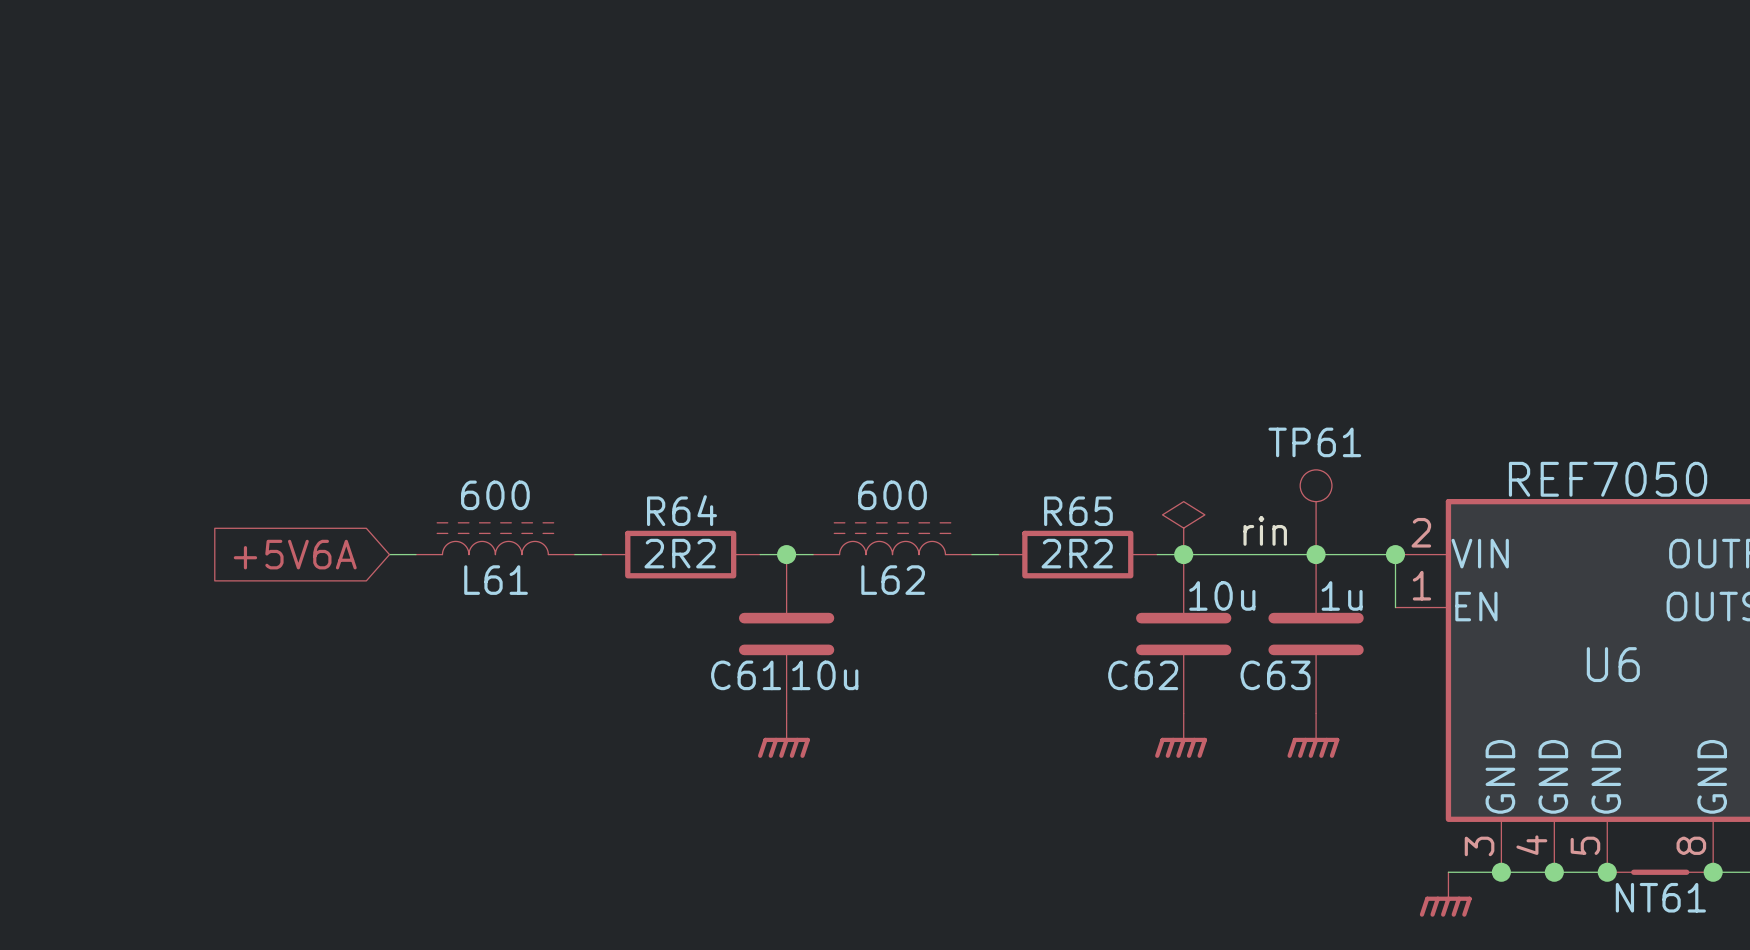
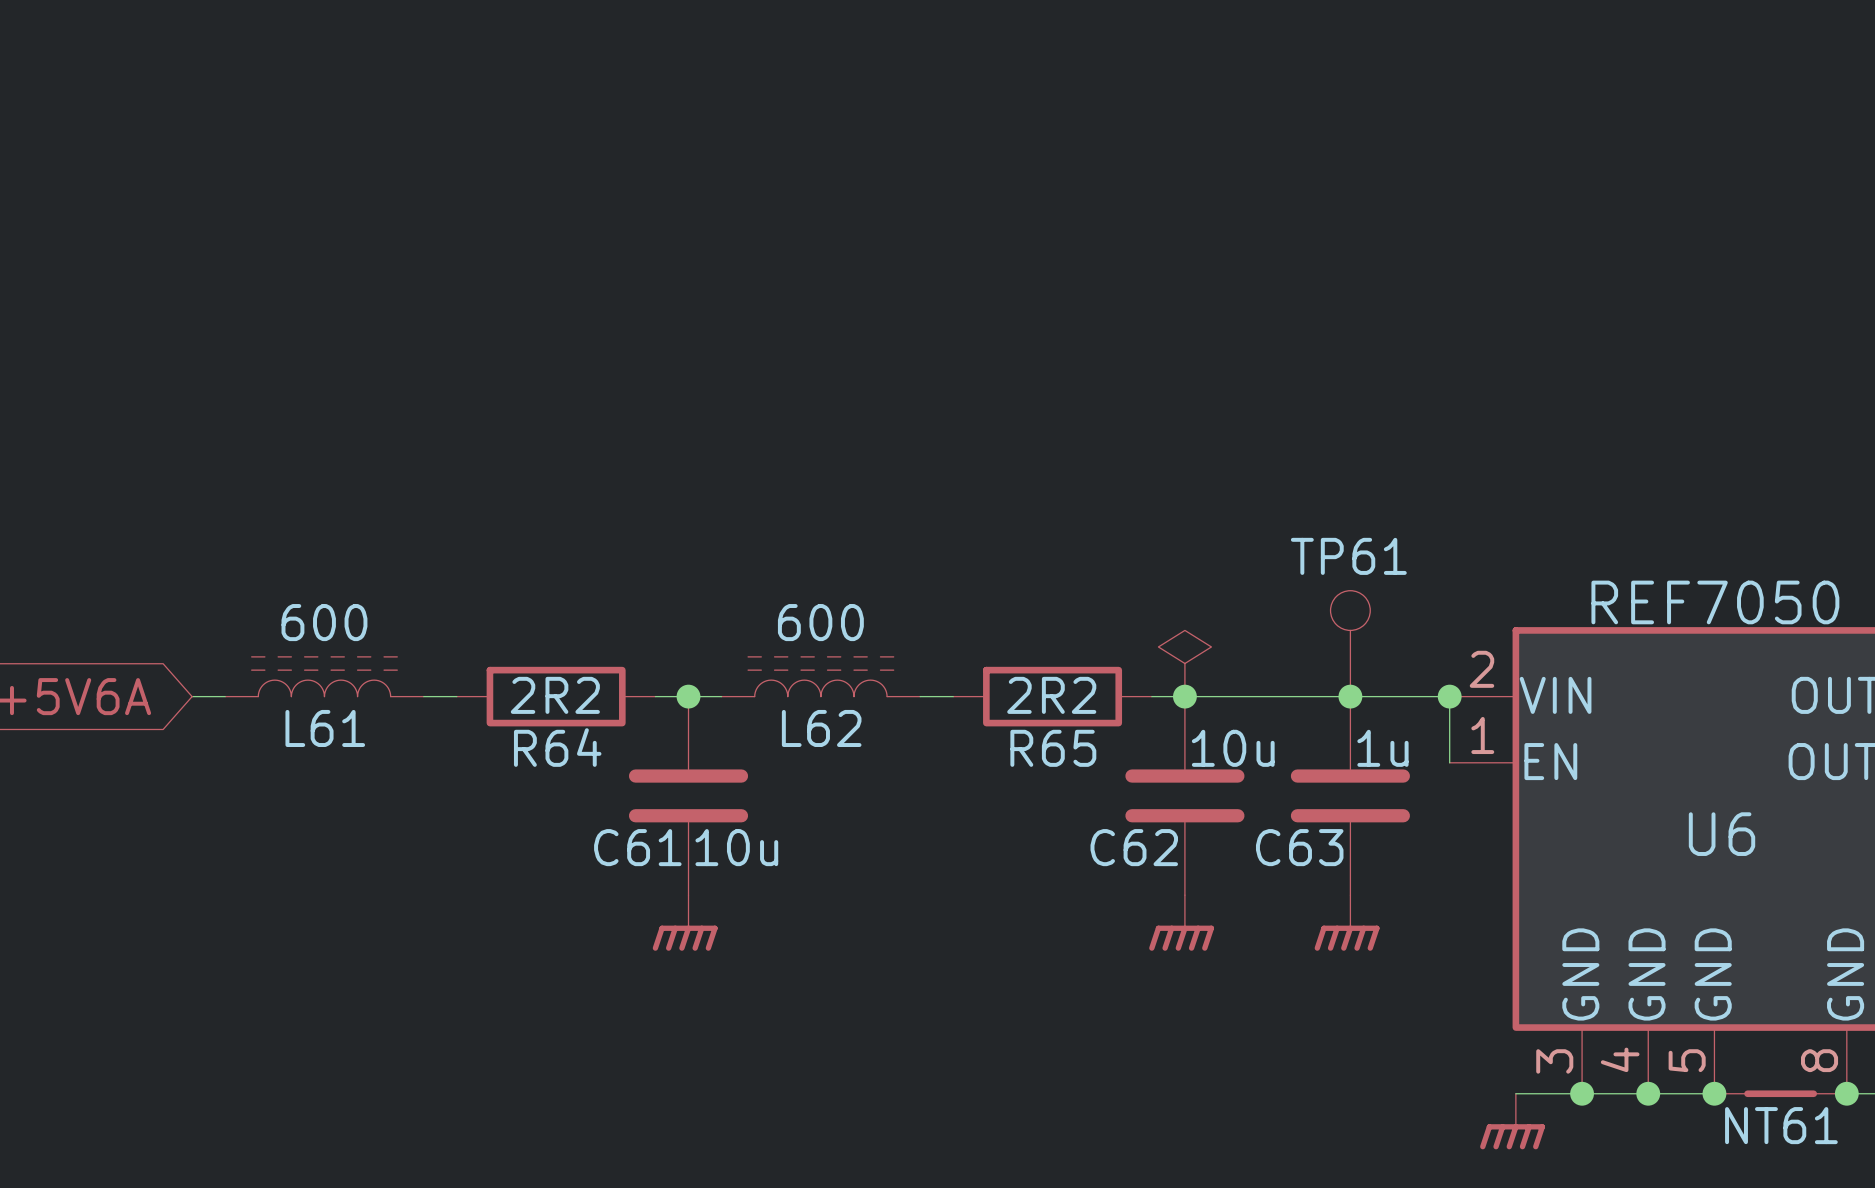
R64 name position: R64 (681, 510) -> R64 (557, 747)
R65 name position: R65 (1078, 511) -> R65 (1053, 748)
label: rin (1265, 530) -> none

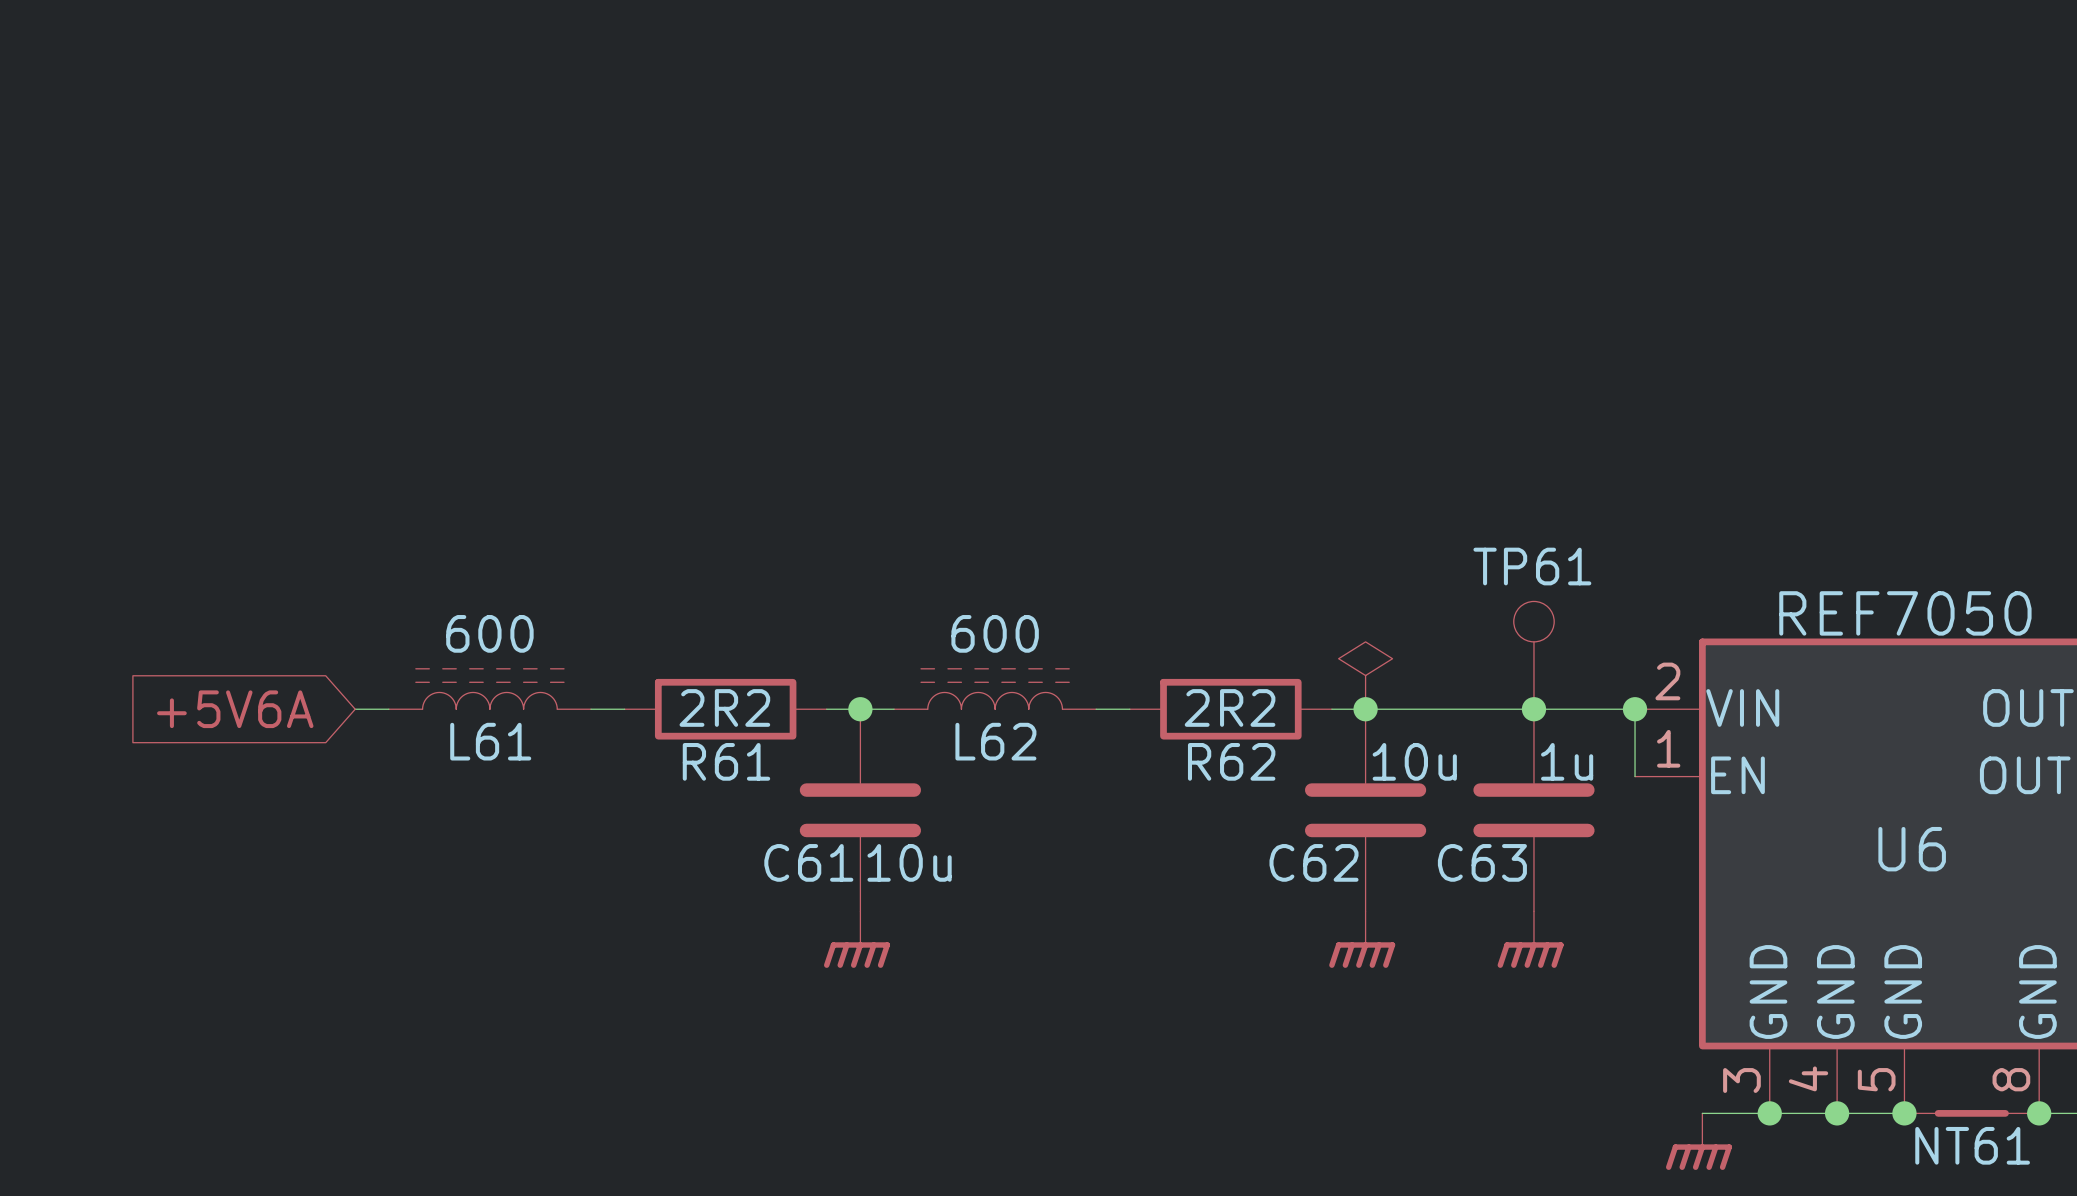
R64 name: R64 (557, 747) -> R61 (726, 761)
R65 name: R65 (1053, 748) -> R62 (1231, 761)

